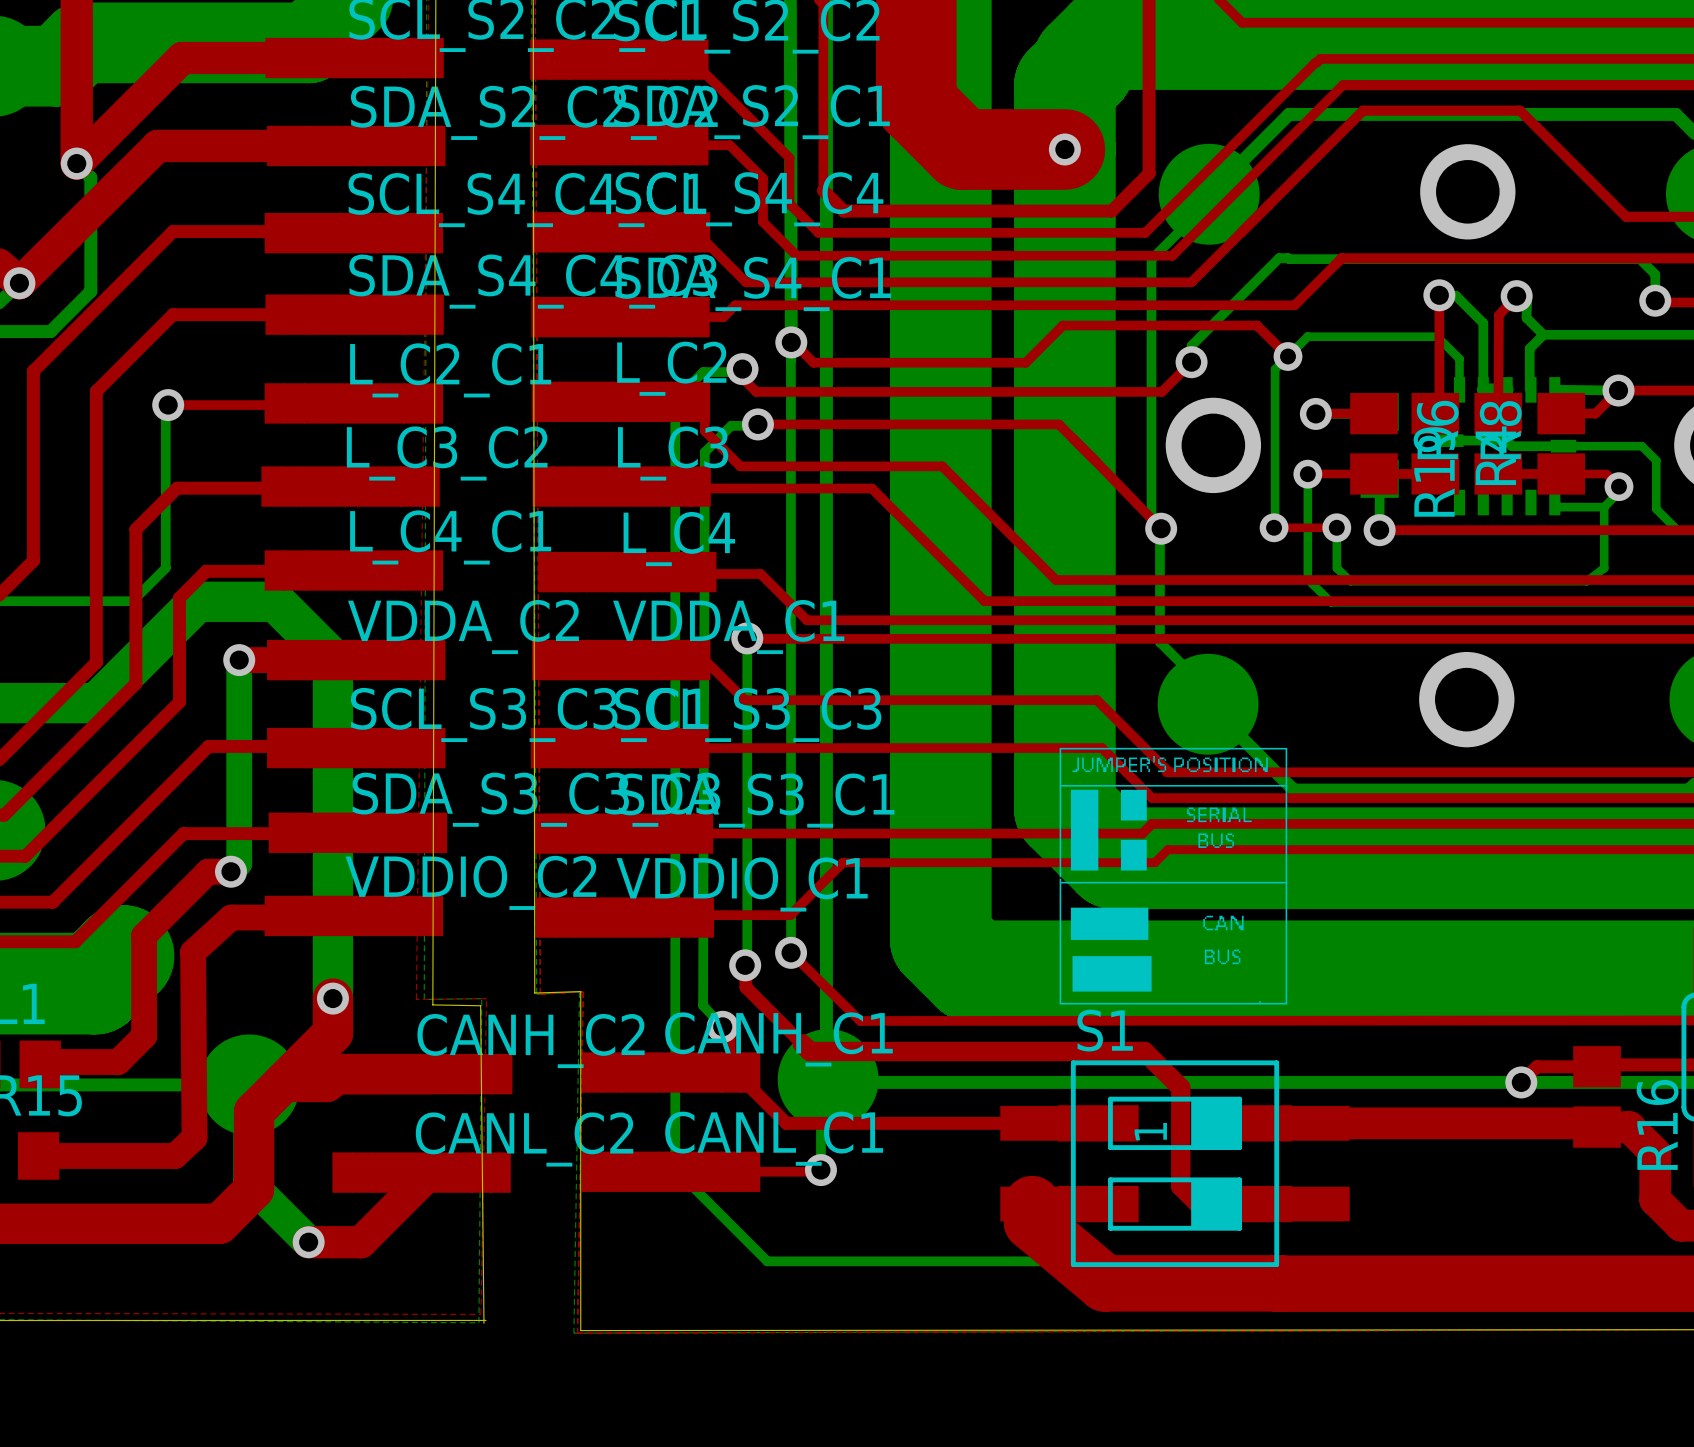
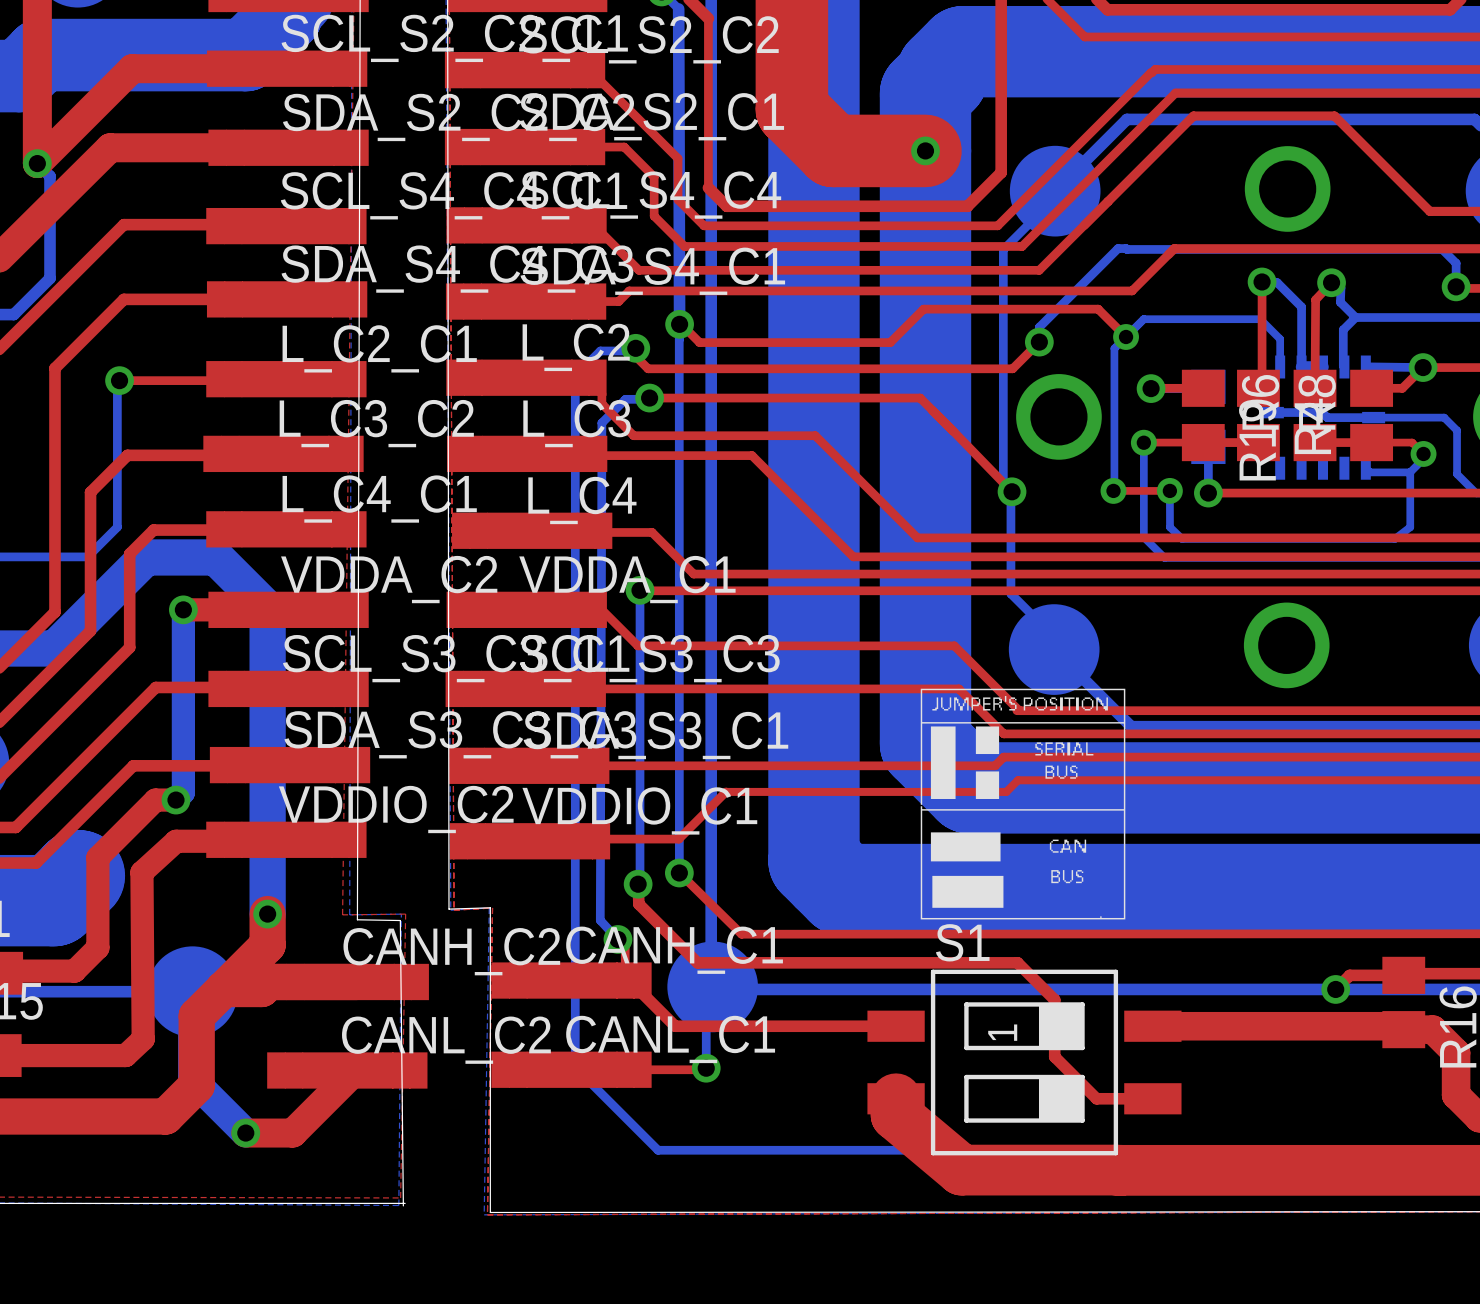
top track: (802, 1043) (809, 1051) (1144, 1051) (1180, 1087) (1180, 1186) (1198, 1204) (1255, 1204) -> (697, 962) (1017, 962) (1054, 999) (1054, 1056) (1096, 1098)
S1 footprint: [1000, 1060, 1350, 1268] -> [867, 969, 1182, 1156]

